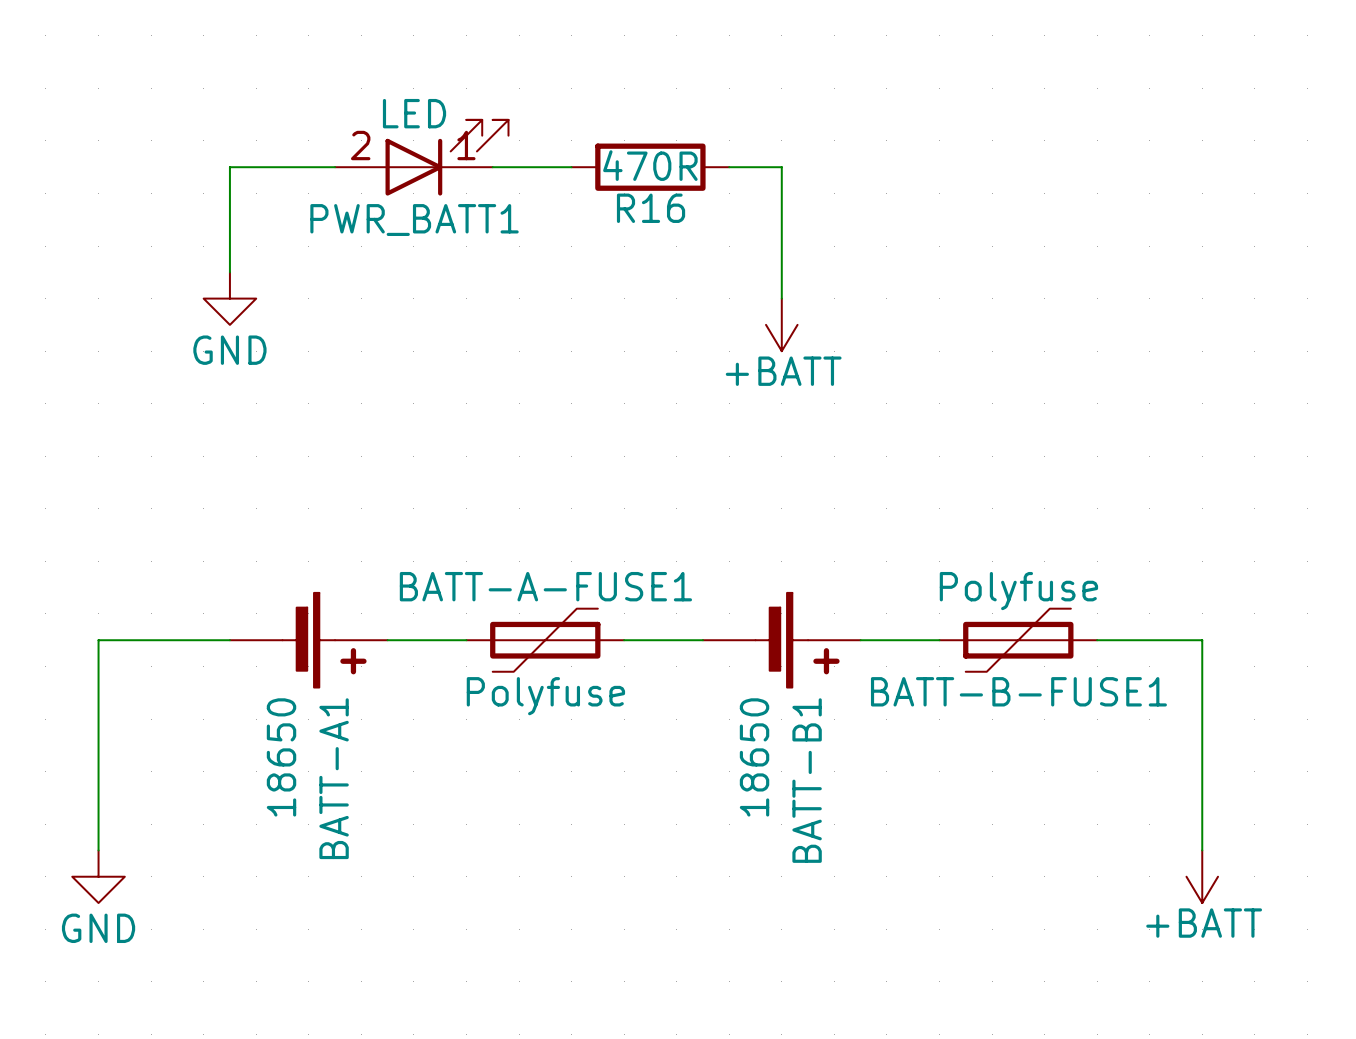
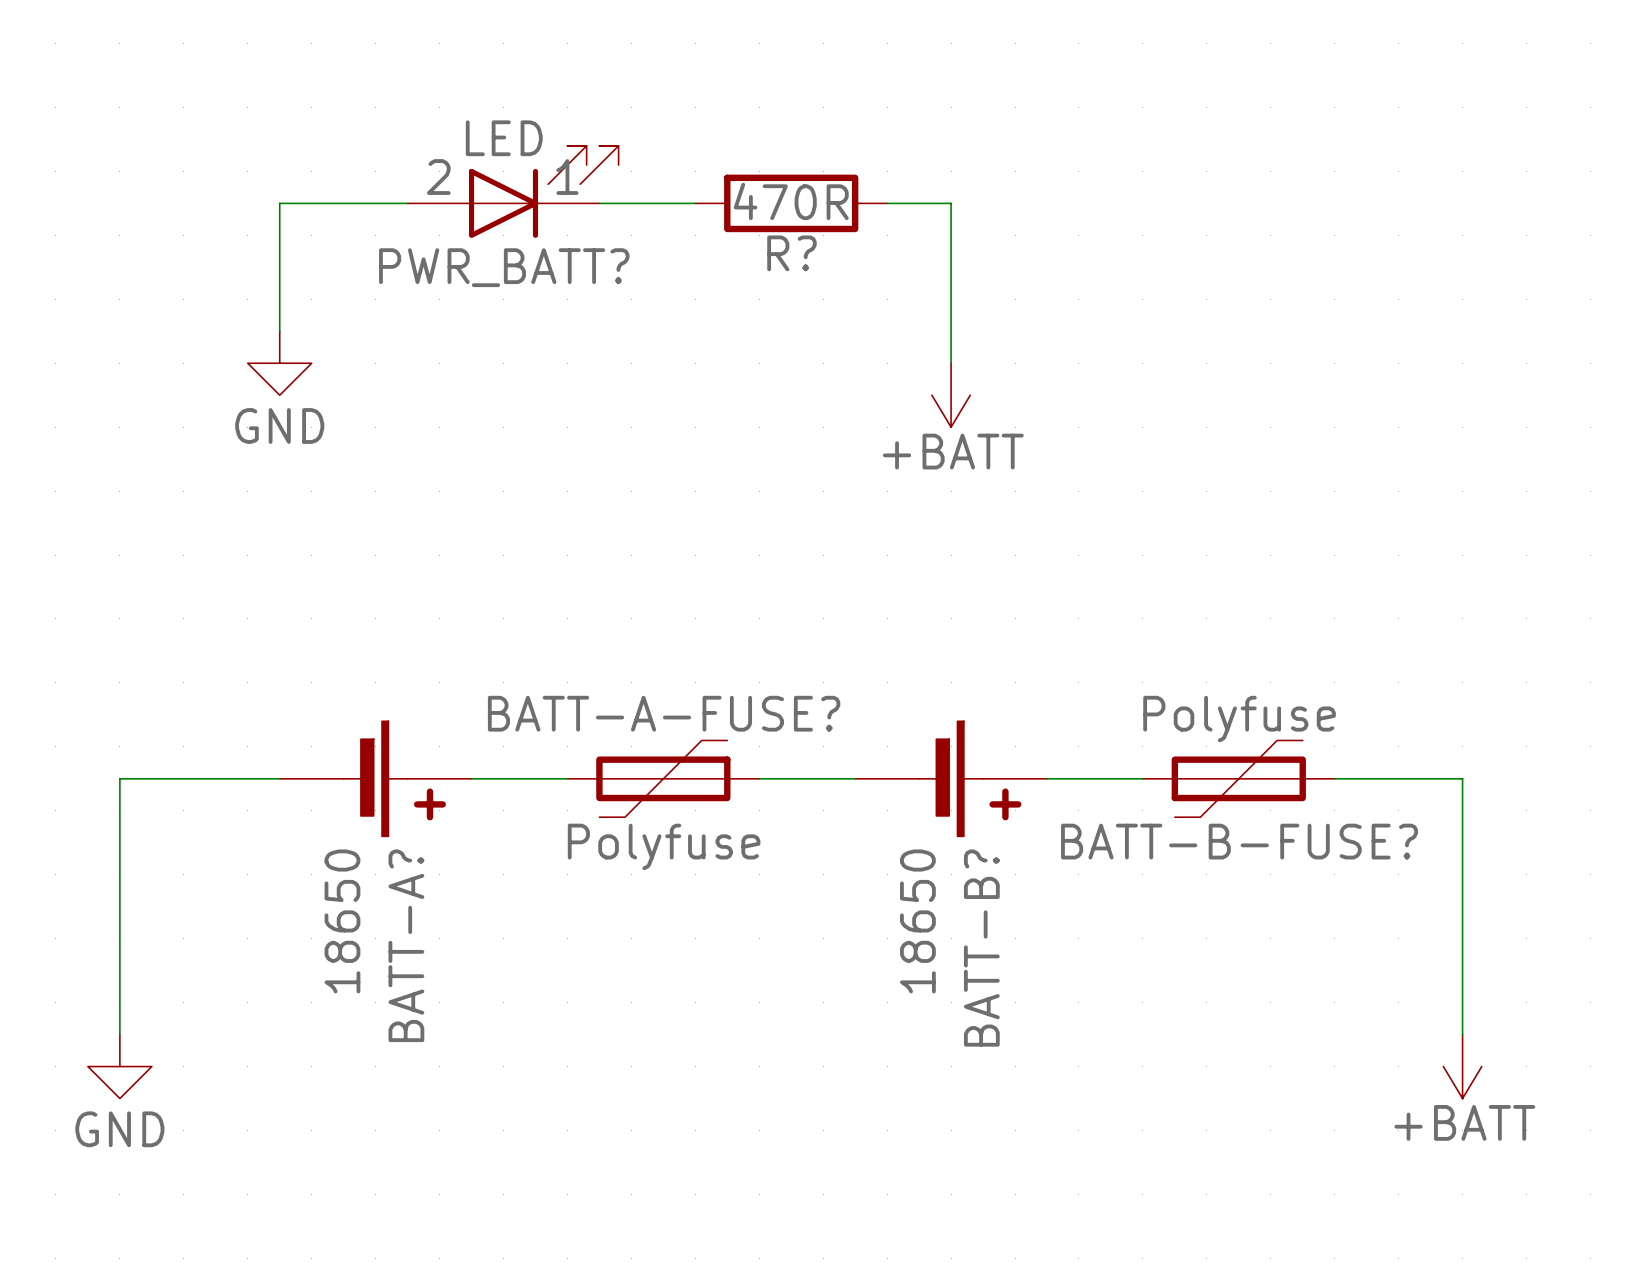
R16 name: R16 (651, 208) -> R? (791, 253)
PWR_BATT1 name: PWR_BATT1 (414, 220) -> PWR_BATT? (504, 267)
BATT-A-FUSE1 name: BATT-A-FUSE1 (545, 586) -> BATT-A-FUSE? (664, 713)
BATT-B-FUSE1 name: BATT-B-FUSE1 (1018, 691) -> BATT-B-FUSE? (1239, 841)
BATT-A1 name: BATT-A1 (334, 778) -> BATT-A? (406, 945)
BATT-B1 name: BATT-B1 (807, 780) -> BATT-B? (981, 948)

